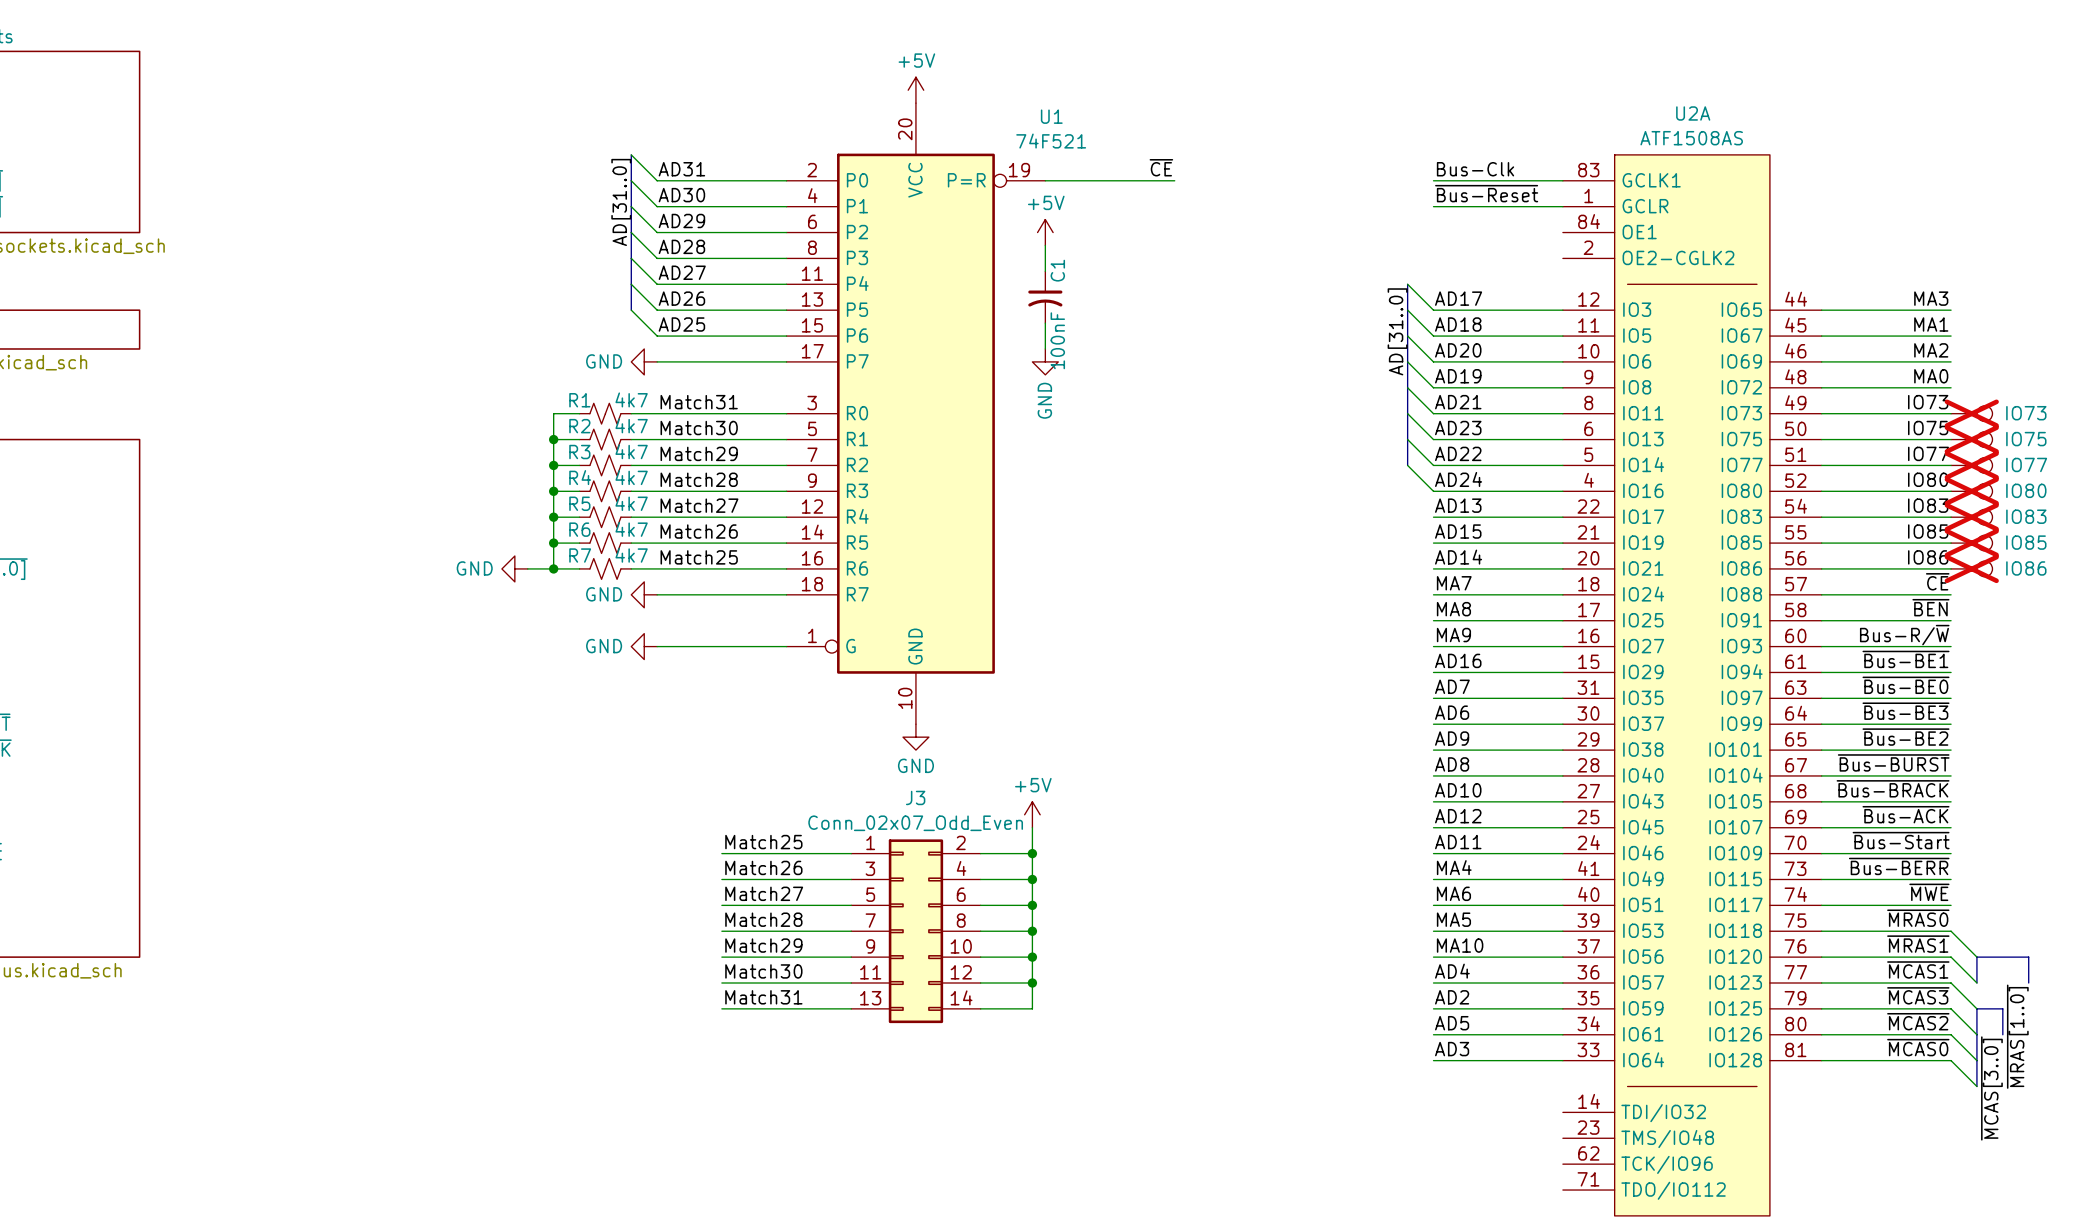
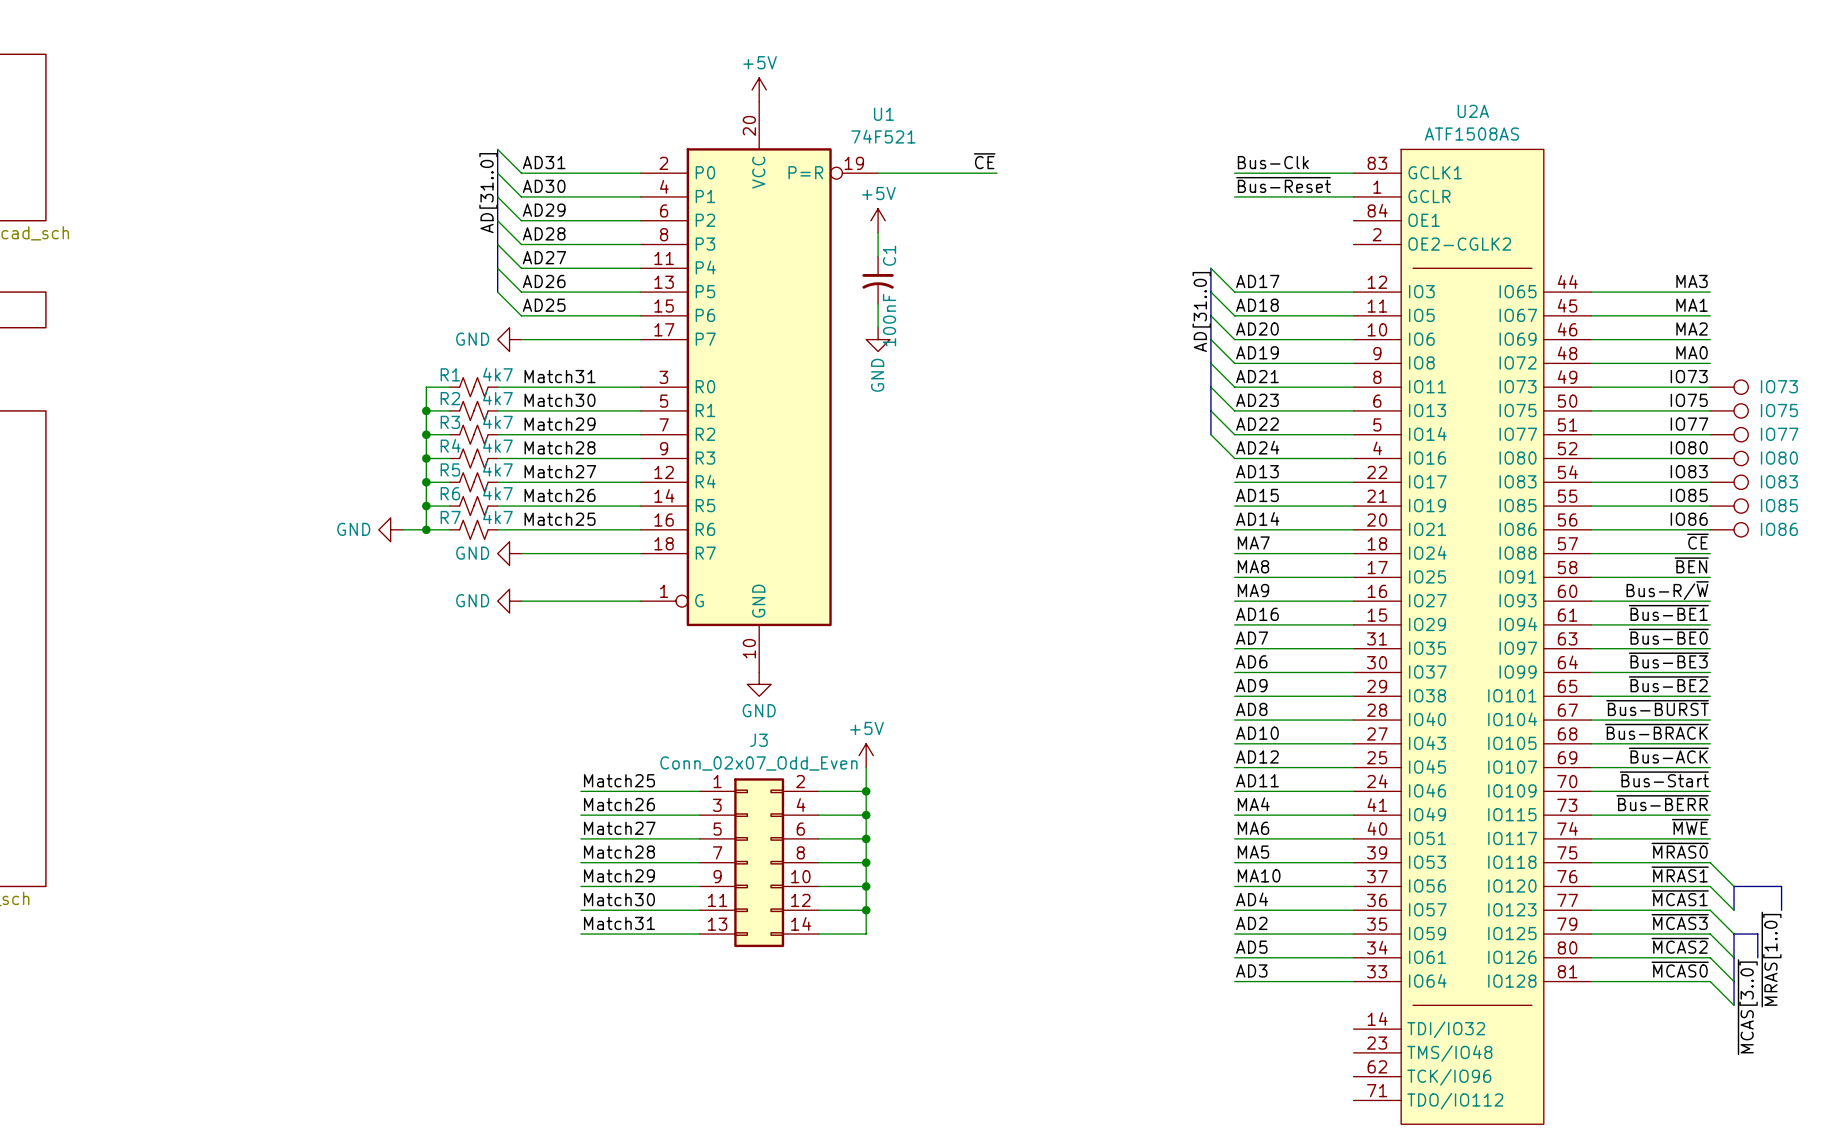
IO73 do-not-place cross: (1971, 413) -> none
IO75 do-not-place cross: (1971, 439) -> none
IO77 do-not-place cross: (1971, 465) -> none
IO80 do-not-place cross: (1971, 491) -> none
IO83 do-not-place cross: (1971, 517) -> none
IO85 do-not-place cross: (1971, 543) -> none
IO86 do-not-place cross: (1971, 568) -> none

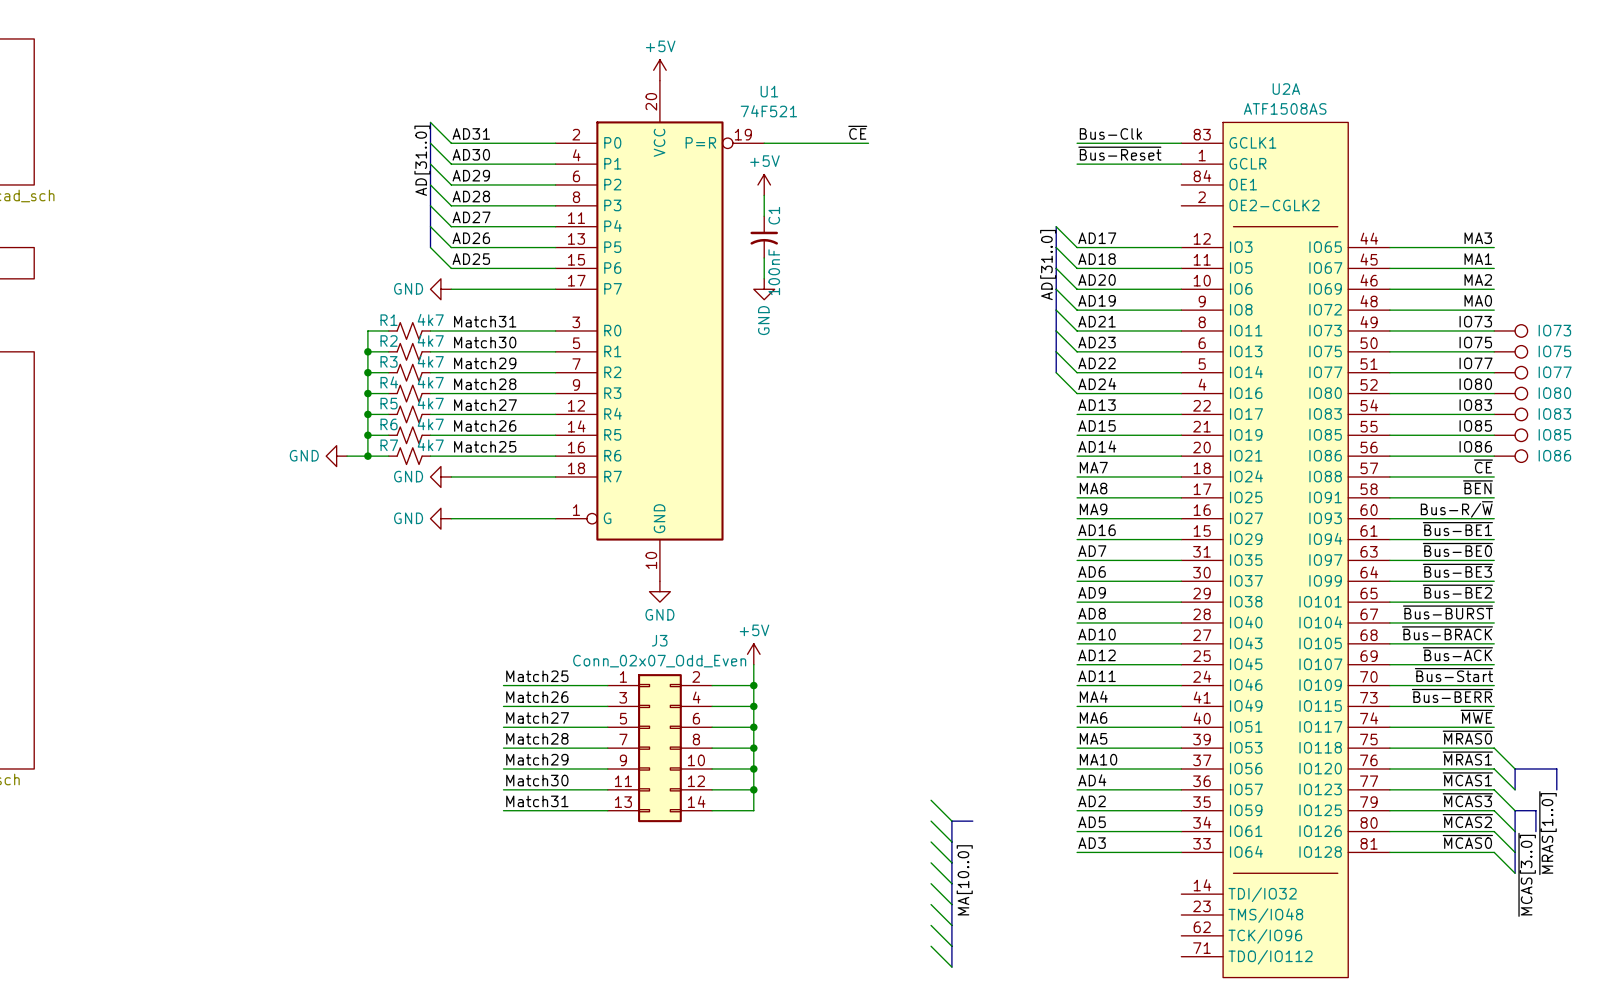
wire: none -> (931, 800) (951, 821)
wire: none -> (931, 821) (951, 841)
bus: none -> (972, 821) (951, 821) (951, 967)
wire: none -> (931, 841) (951, 862)
wire: none -> (931, 862) (951, 883)
label: none -> MA[10..0] (964, 880)
wire: none -> (931, 883) (951, 904)
wire: none -> (931, 904) (951, 925)
wire: none -> (931, 925) (951, 946)
wire: none -> (931, 946) (951, 967)

